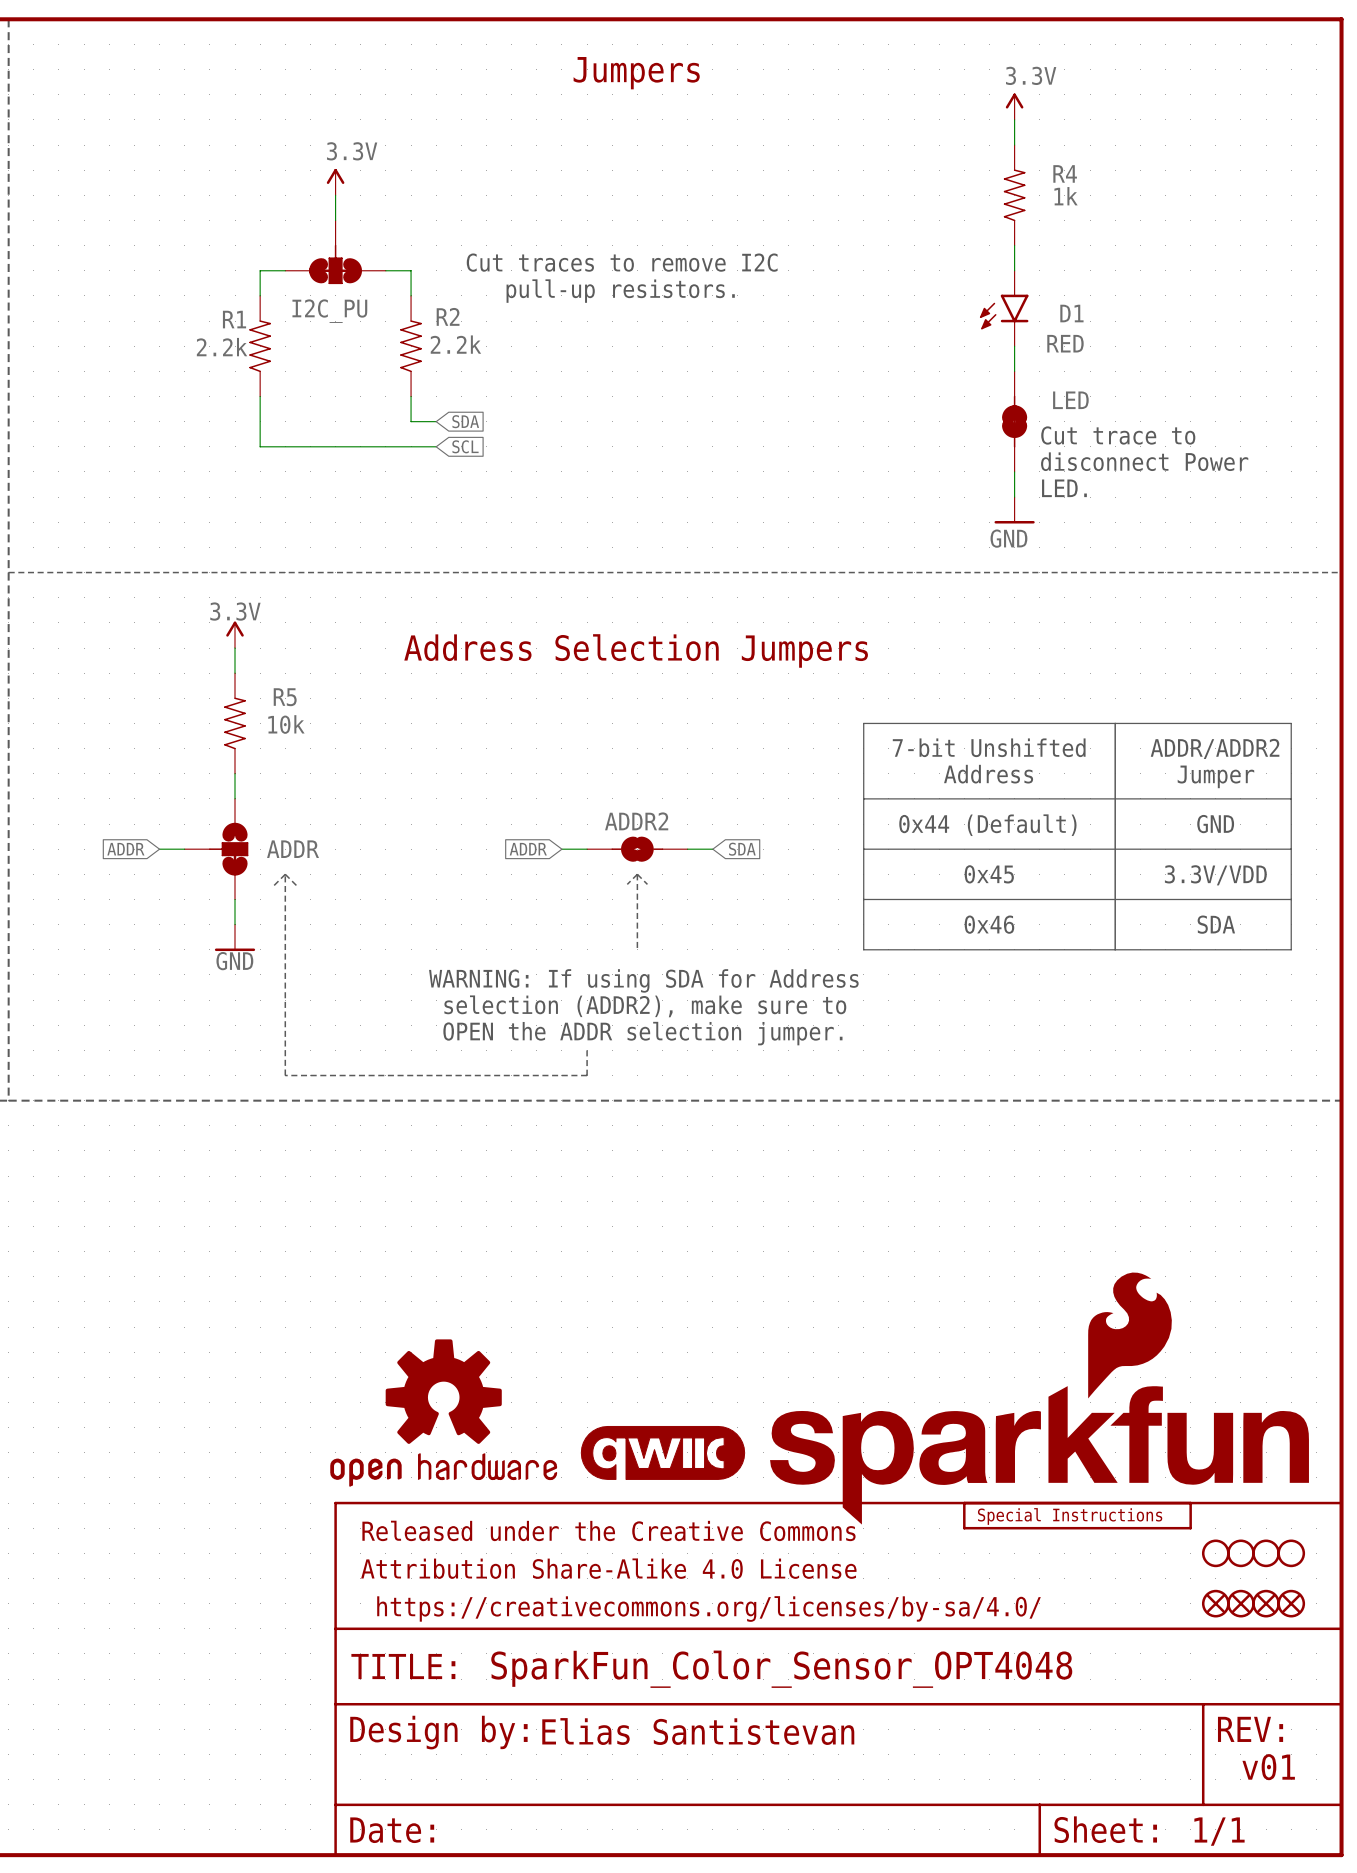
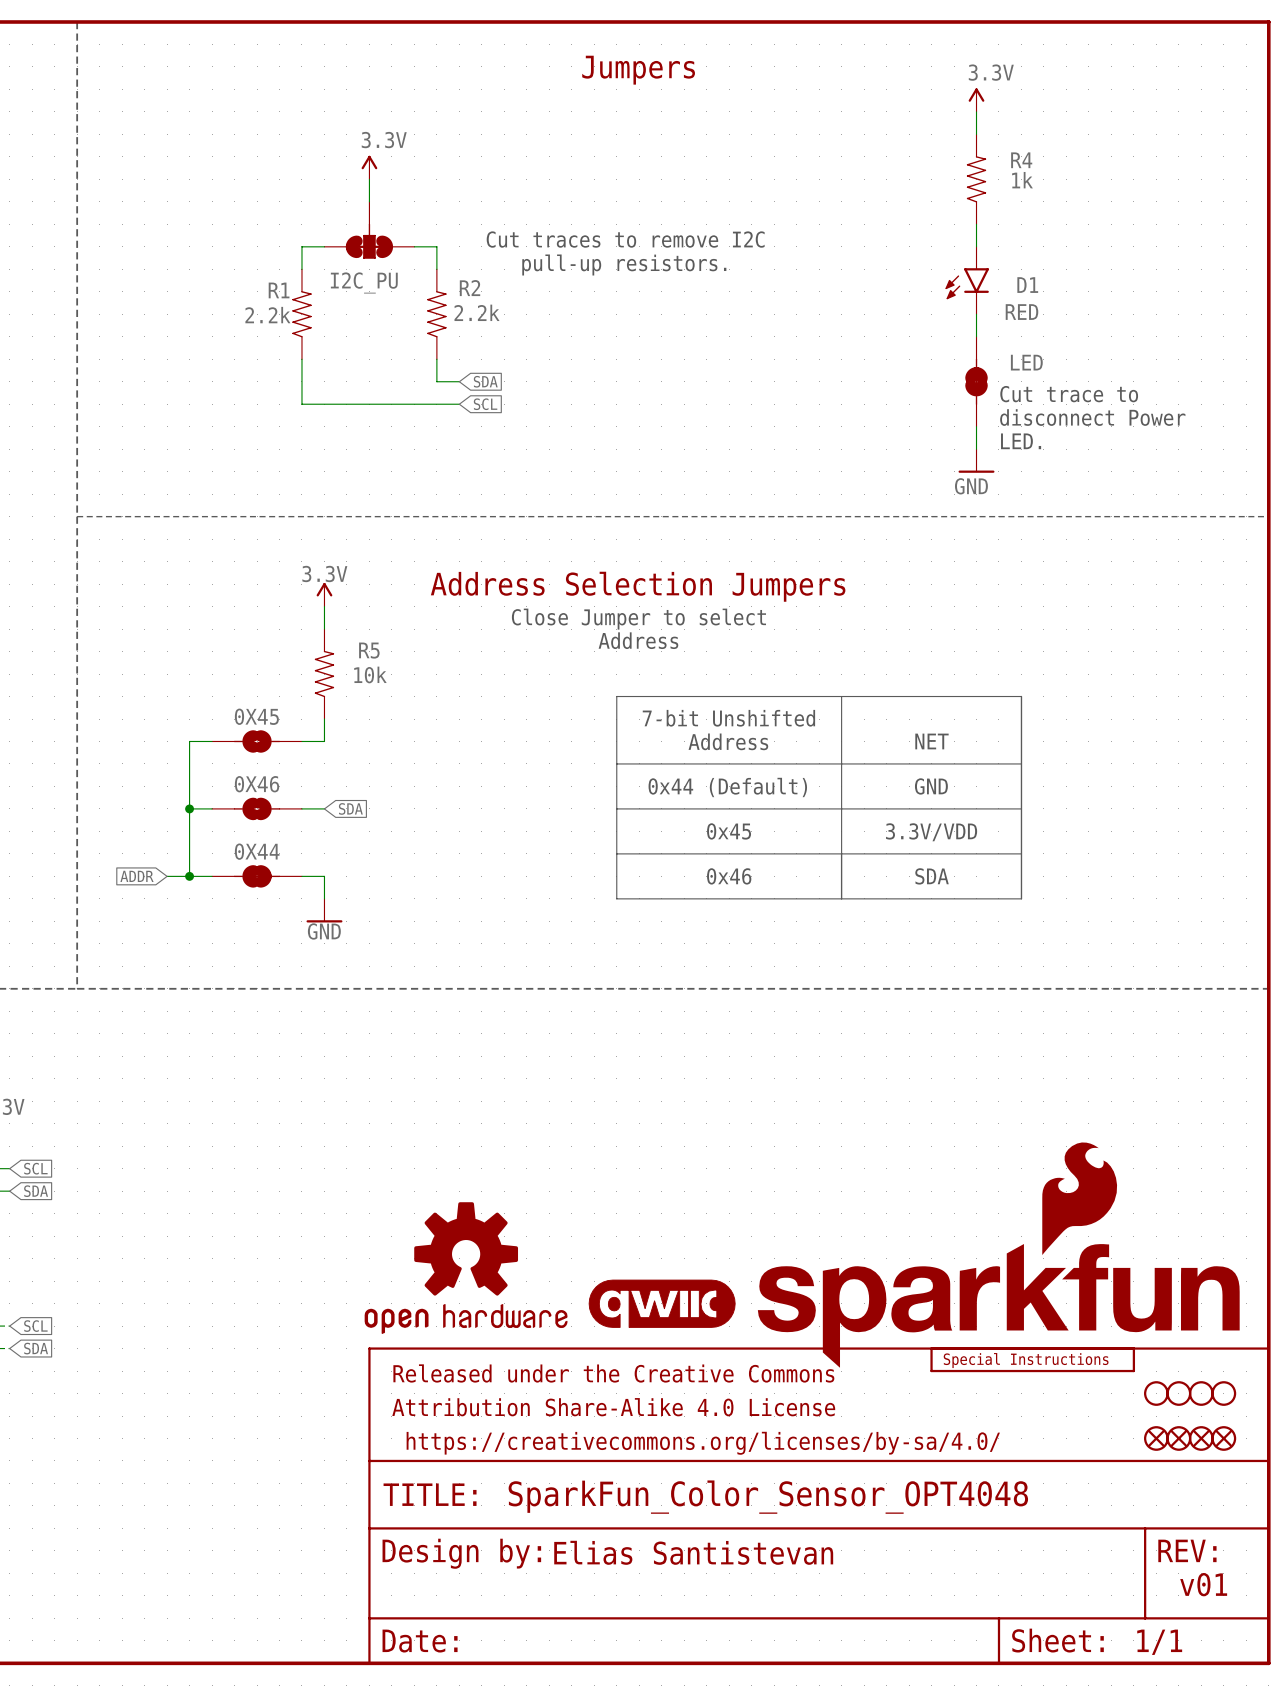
power symbol position: 3.3V (235, 634) -> 3.3V (324, 594)
wire: (235, 648) (235, 673) -> (324, 606) (324, 629)
text: none -> Close Jumper to select (638, 619)
text: none -> Address (638, 640)
R5 position: (235, 723) -> (324, 674)
line: (1115, 723) (1115, 949) -> none
text: 7-bit Unshifted (989, 747) -> none
text: ADDR/ADDR2 (1215, 748) -> none
wire: (235, 773) (235, 798) -> none
line: none -> (616, 696) (616, 898) (1021, 898) (1021, 696) (616, 696)
line: (863, 773) (863, 723) (1291, 723) (1291, 949) (1064, 949) -> none
text: Address (988, 774) -> none
text: Jumper (1215, 776) -> none
wire: none -> (324, 719) (324, 741) (301, 741)
text: none -> 7-bit Unshifted (728, 718)
line: (863, 798) (1291, 798) -> none
wire: none -> (212, 741) (189, 741) (189, 876)
0X45: none -> (257, 741)
text: none -> Address (728, 741)
text: none -> NET (931, 741)
text: GND (1215, 824) -> none
text: 0x44 (Default) (987, 825) -> none
global label position: ADDR (125, 849) -> ADDR (137, 876)
wire: (159, 849) (184, 849) -> (189, 808) (212, 808)
ADDR: (216, 849) -> none
global label: ADDR (528, 849) -> none
wire: (561, 849) (587, 849) -> none
line: none -> (616, 763) (841, 763)
ADDR2: (637, 849) -> none
global label: SDA (742, 849) -> none
line: (1064, 849) (1291, 849) -> none
line: (285, 874) (285, 1075) (587, 1075) (587, 1050) -> none
line: (285, 874) (272, 886) -> none
line: (285, 874) (297, 886) -> none
line: (637, 874) (637, 949) -> none
line: (637, 874) (627, 884) -> none
line: (637, 874) (647, 884) -> none
text: none -> GND (931, 786)
text: 0x45 (989, 874) -> none
text: none -> 0x44 (Default) (727, 787)
text: 3.3V/VDD (1215, 875) -> none
junction: none -> (189, 808)
0X46: none -> (257, 808)
wire: (235, 899) (235, 924) -> none
wire: none -> (301, 808) (324, 808)
global label: none -> SDA (350, 808)
line: none -> (616, 808) (841, 808)
line: (1064, 899) (1291, 899) -> none
text: none -> 0x45 (729, 831)
text: 0x46 (989, 924) -> none
text: SDA (1216, 924) -> none
text: none -> 3.3V/VDD (931, 832)
power symbol position: GND (235, 937) -> GND (324, 910)
line: none -> (616, 853) (841, 853) (841, 898)
wire: none -> (167, 876) (212, 876)
junction: none -> (189, 876)
0X44: none -> (257, 876)
wire: none -> (301, 876) (324, 876) (324, 898)
text: none -> 0x46 (729, 876)
text: none -> SDA (932, 876)
text: WARNING: If using SDA for Address (643, 980) -> none
text: selection (ADDR2), make sure to (645, 1006) -> none
text: OPEN the ADDR selection jumper. (642, 1033) -> none

